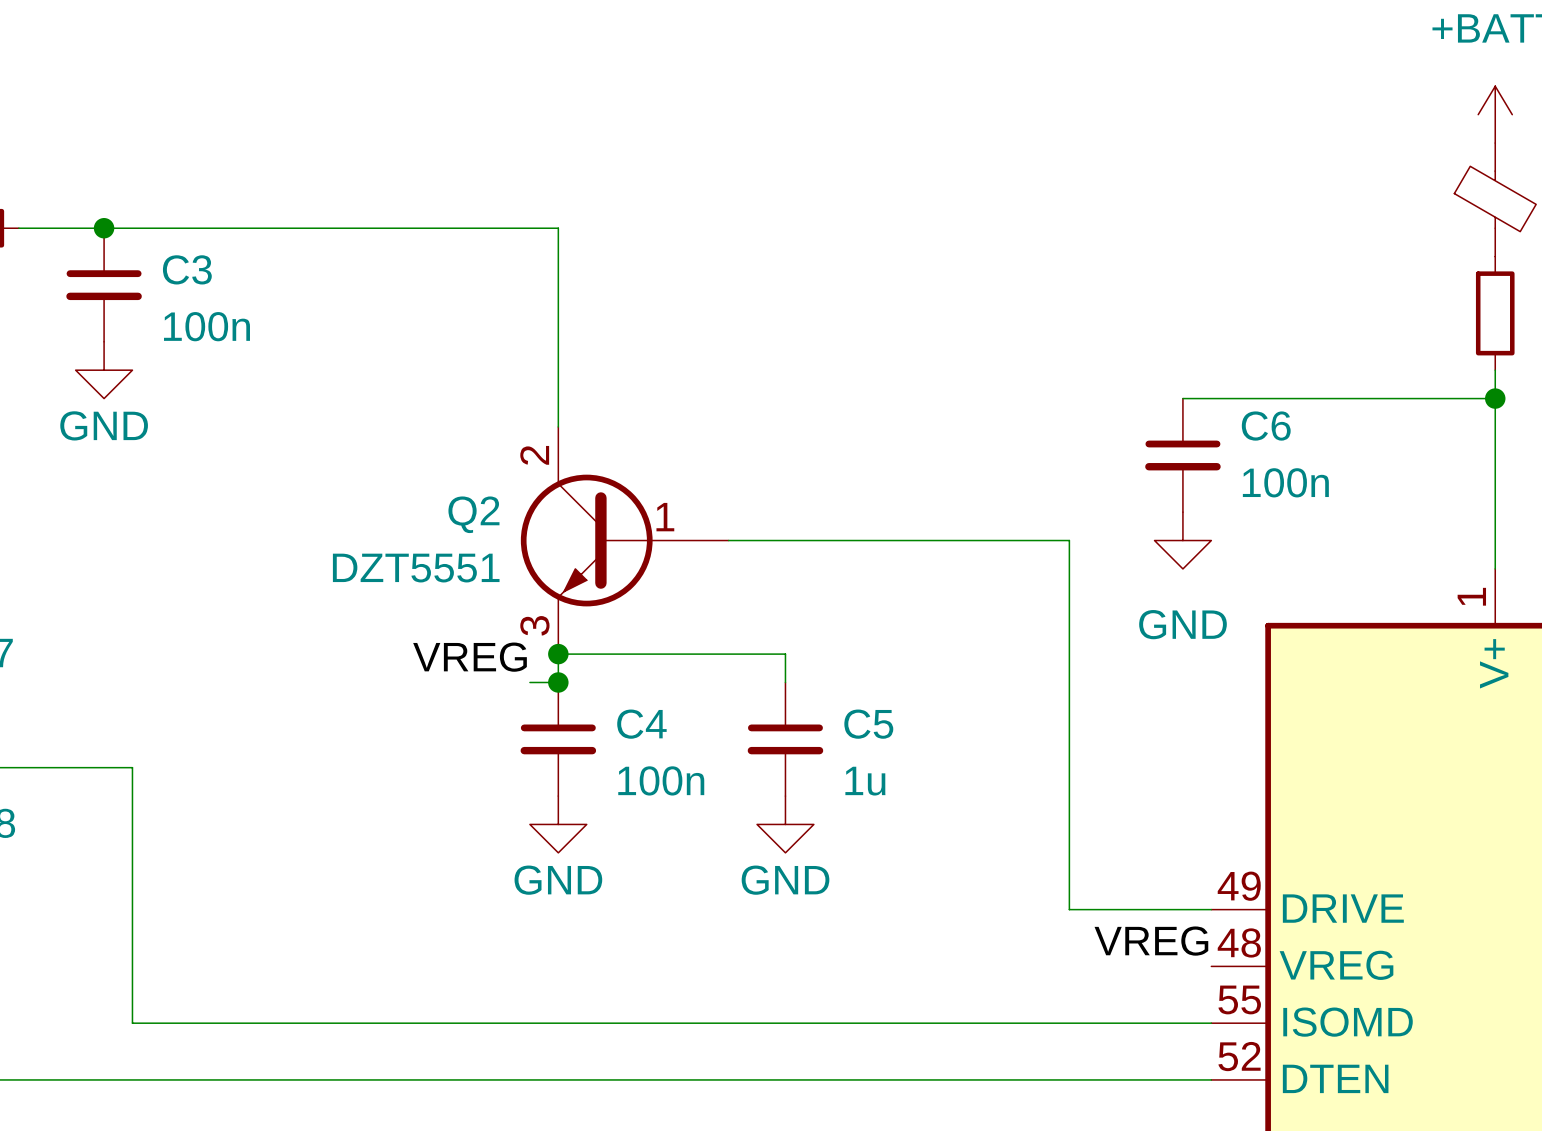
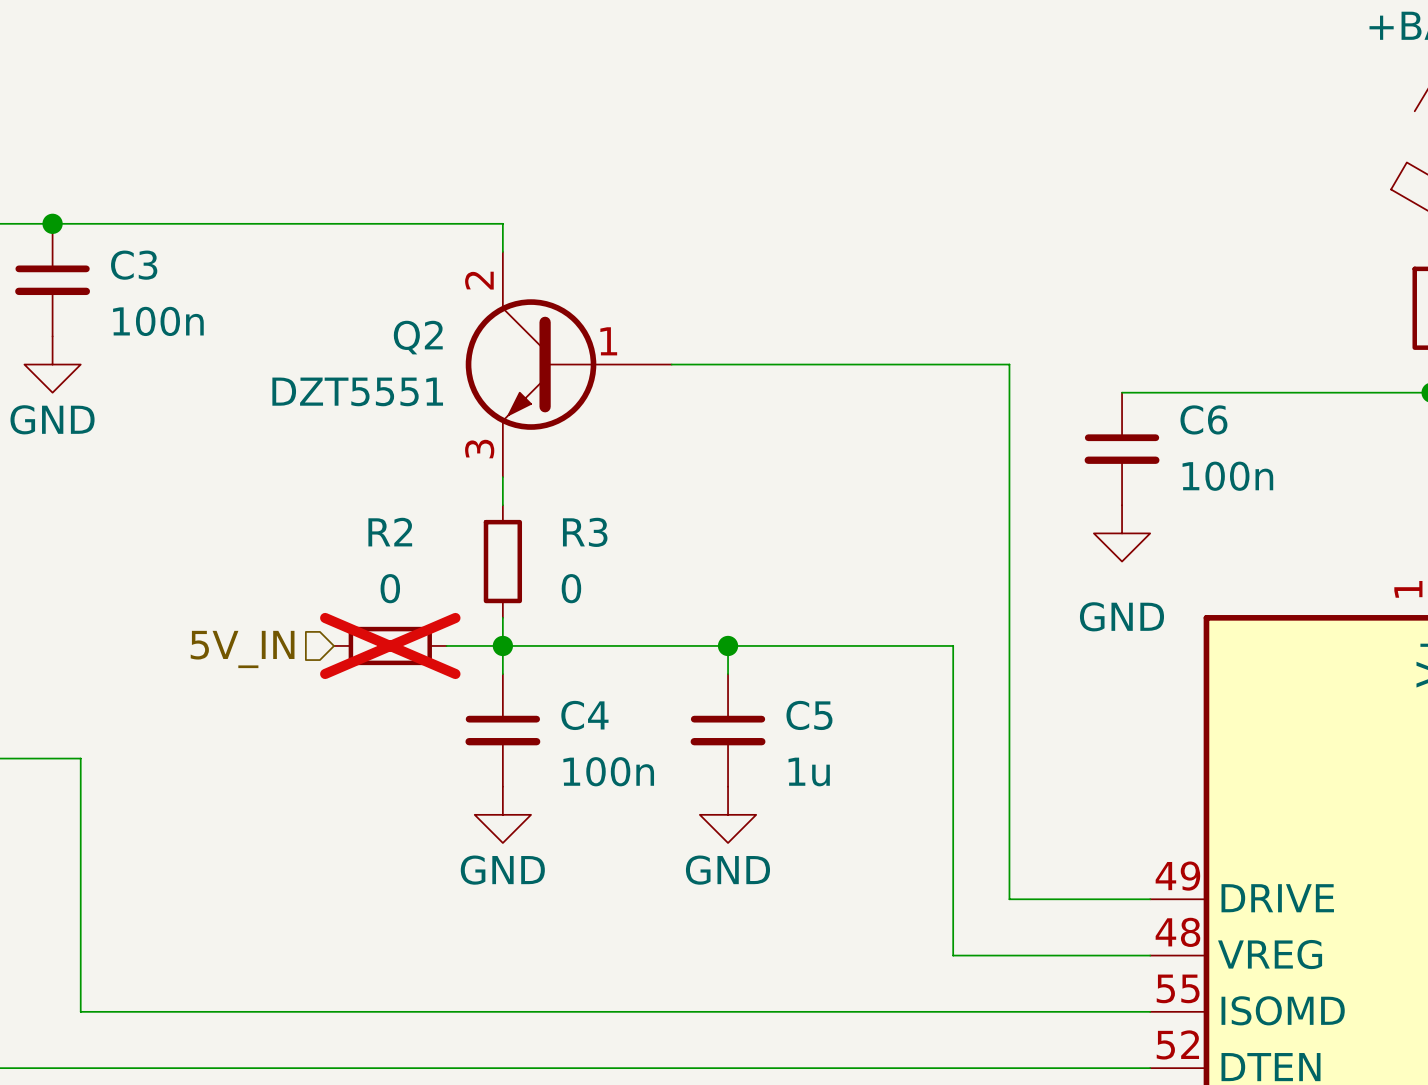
wire: (558, 256) (558, 426) -> none
wire: none -> (502, 477) (502, 505)
Q2 position: (624, 540) -> (568, 364)
wire: (728, 540) (1069, 540) -> (671, 364) (1009, 364) (1009, 533)
R3: none -> 0 (502, 561)
wire: none -> (502, 617) (502, 645) (446, 645)
R2: none -> 0 (390, 645)
wire: none -> (728, 645) (953, 645) (953, 955) (1150, 955)
junction: none -> (728, 645)
hierarchical label: none -> 5V_IN (242, 649)
label: VREG (470, 657) -> none
wire: (529, 682) (558, 682) -> none
junction: (558, 682) -> none
label: VREG (1151, 941) -> none

